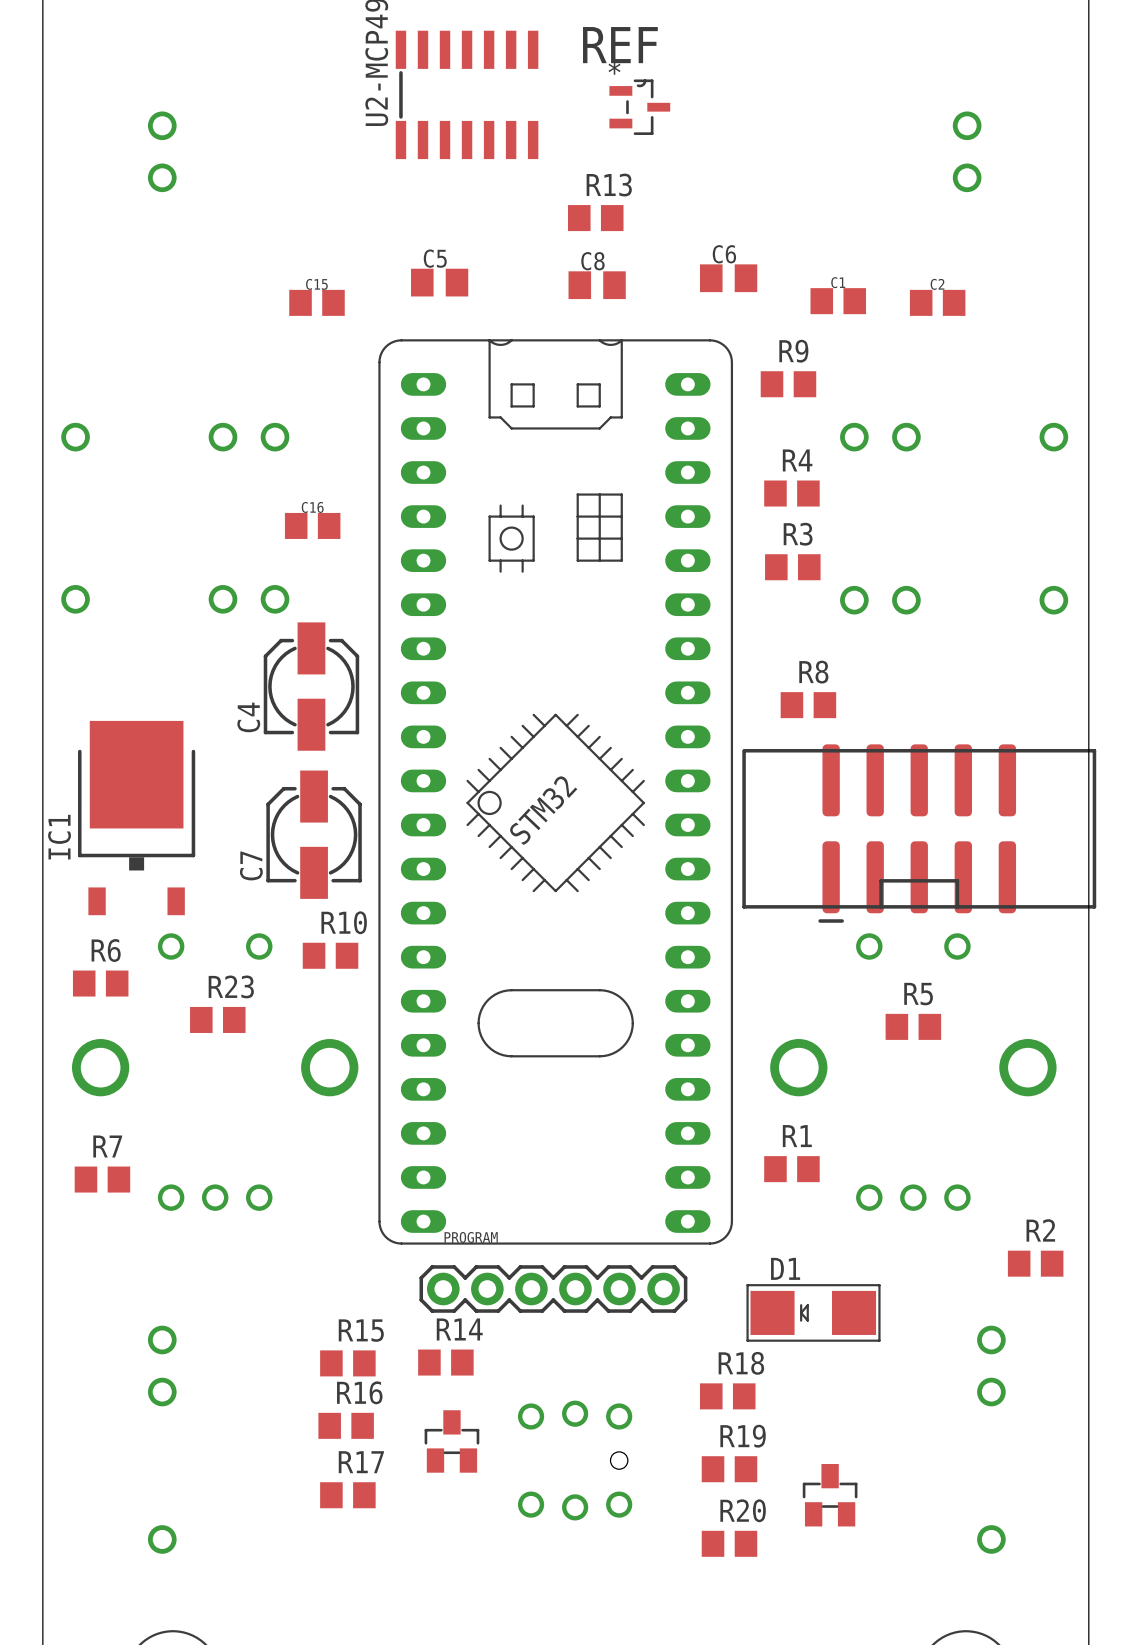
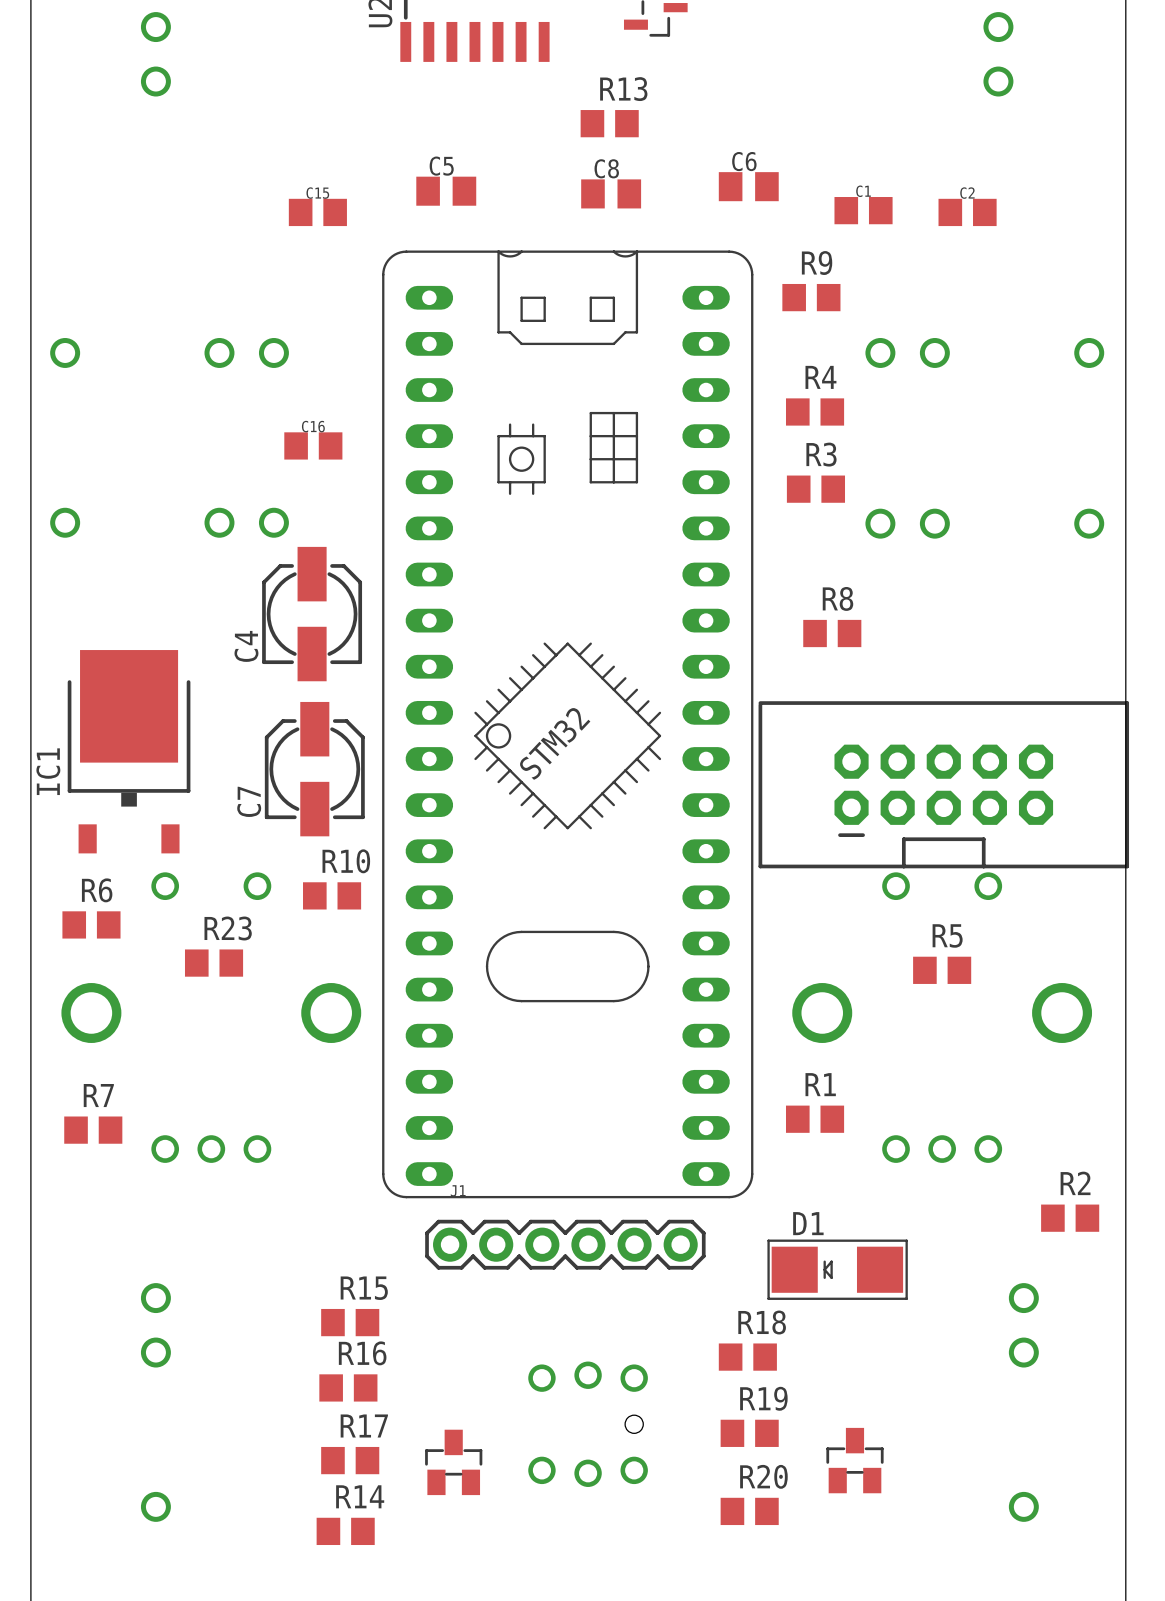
part footprint: [742, 744, 1097, 923] -> [758, 701, 1130, 869]
PROGRAM name: PROGRAM (471, 1237) -> J1 (458, 1190)
R14 position: (445, 1362) -> (345, 1531)
part position: (451, 1441) -> (453, 1462)

